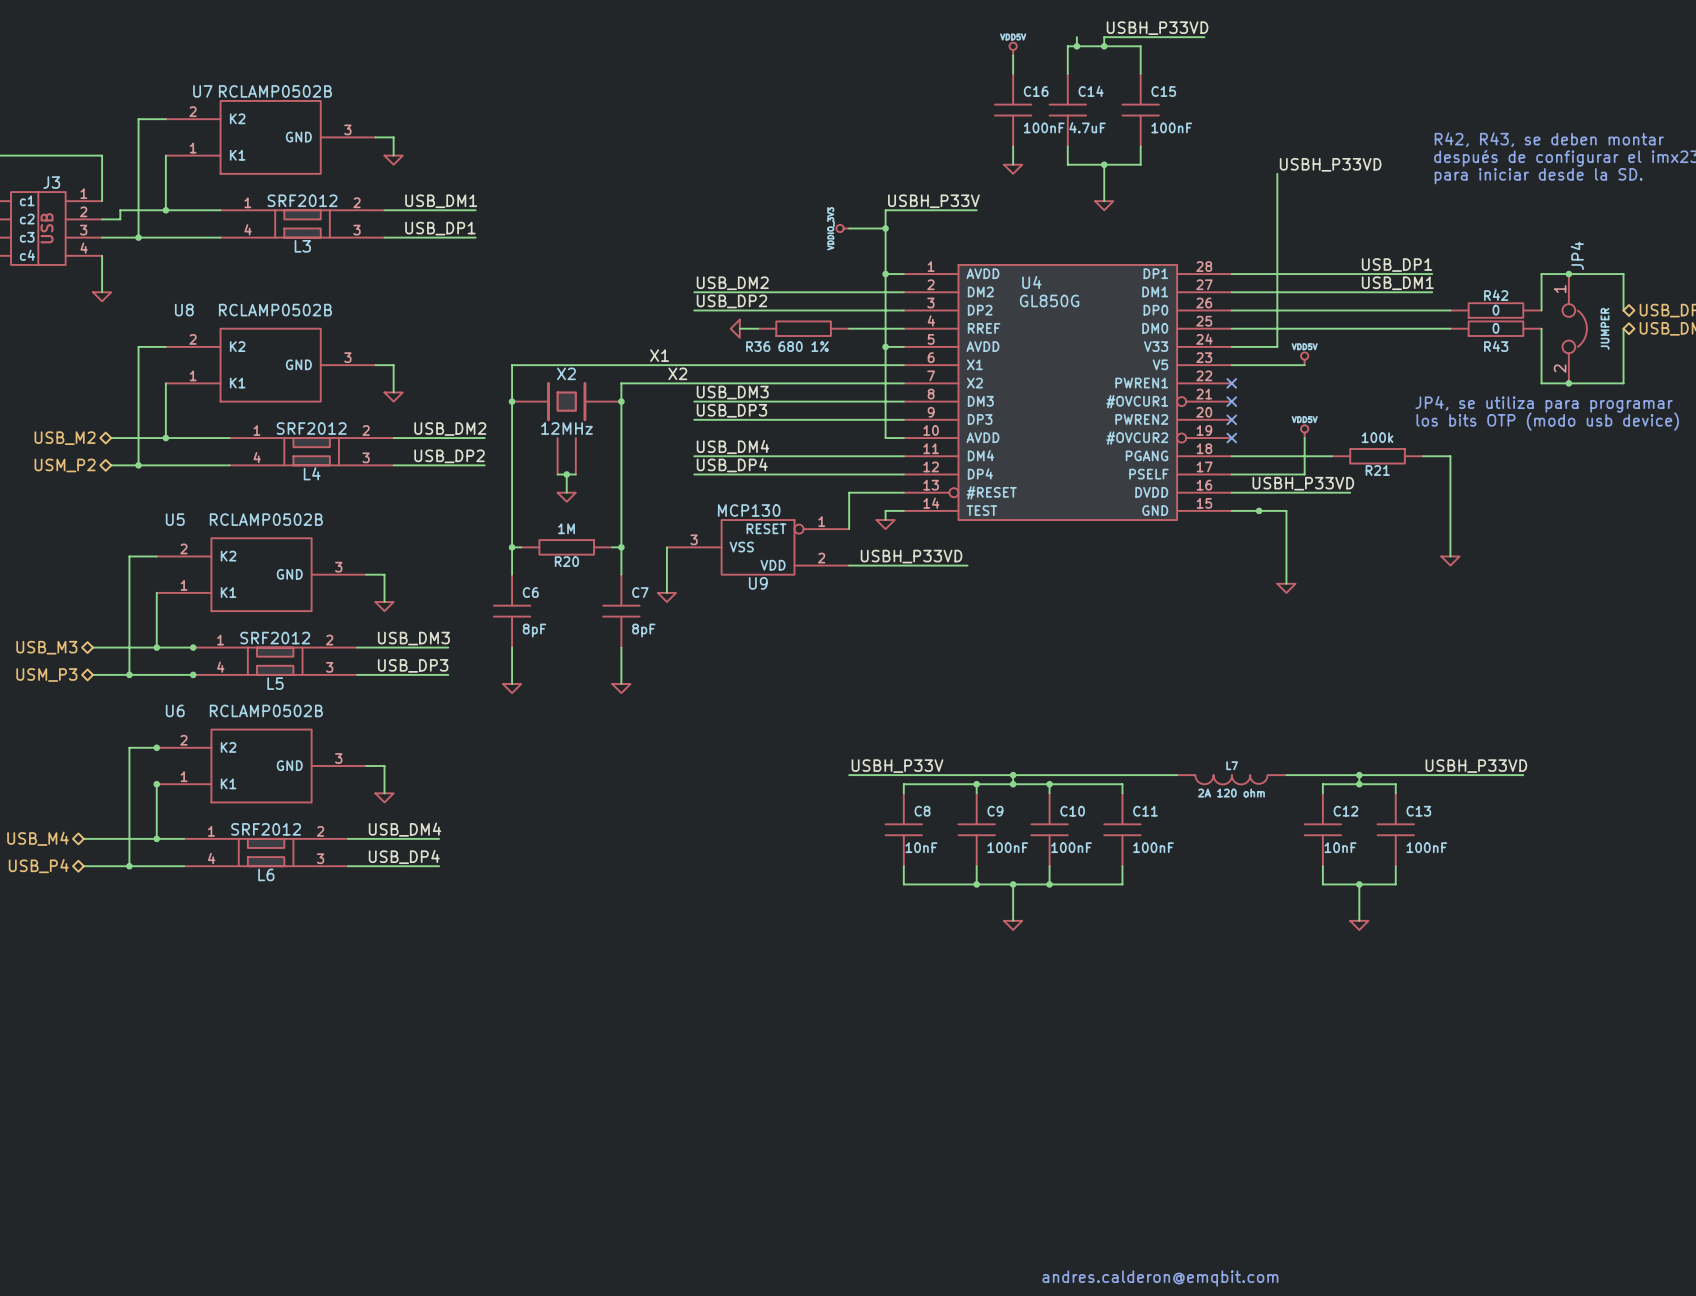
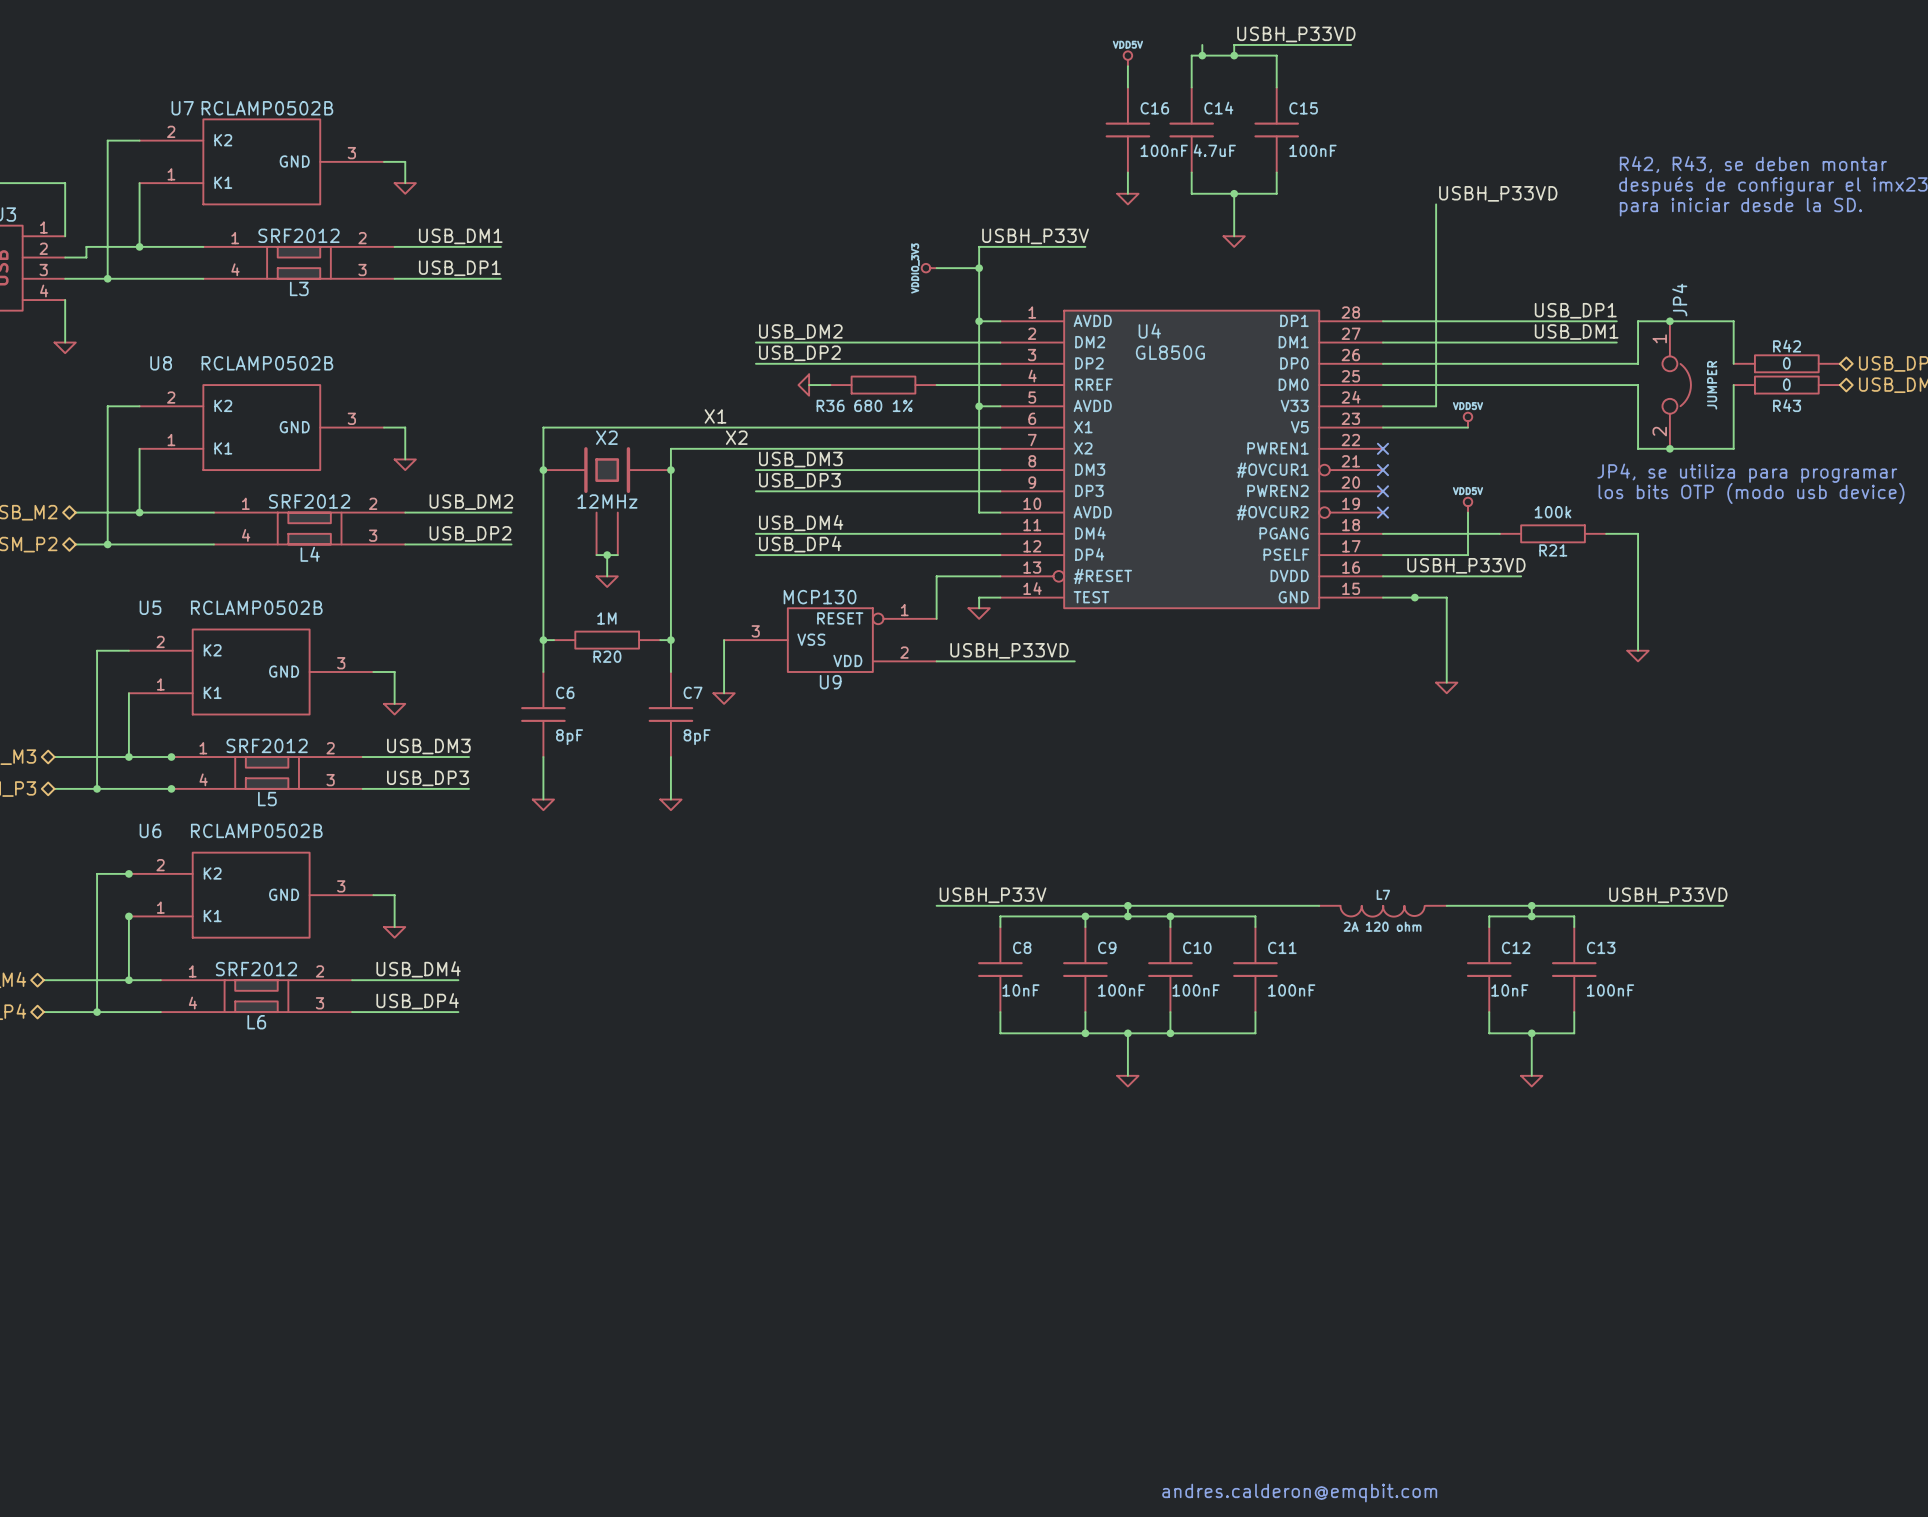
junction: none -> (1669, 321)
junction: (1568, 274) -> none
R42 position: (1495, 310) -> (1786, 363)
wire: (1541, 310) (1541, 274) (1623, 274) (1623, 310) -> (1638, 363) (1638, 321) (1733, 321) (1733, 363)
R43 position: (1495, 328) -> (1786, 385)
wire: (1541, 328) (1541, 383) (1623, 383) (1623, 328) -> (1638, 385) (1638, 448) (1733, 448) (1733, 385)
JP4 position: (1574, 328) -> (1676, 385)
junction: none -> (1669, 448)
junction: (1568, 383) -> none

